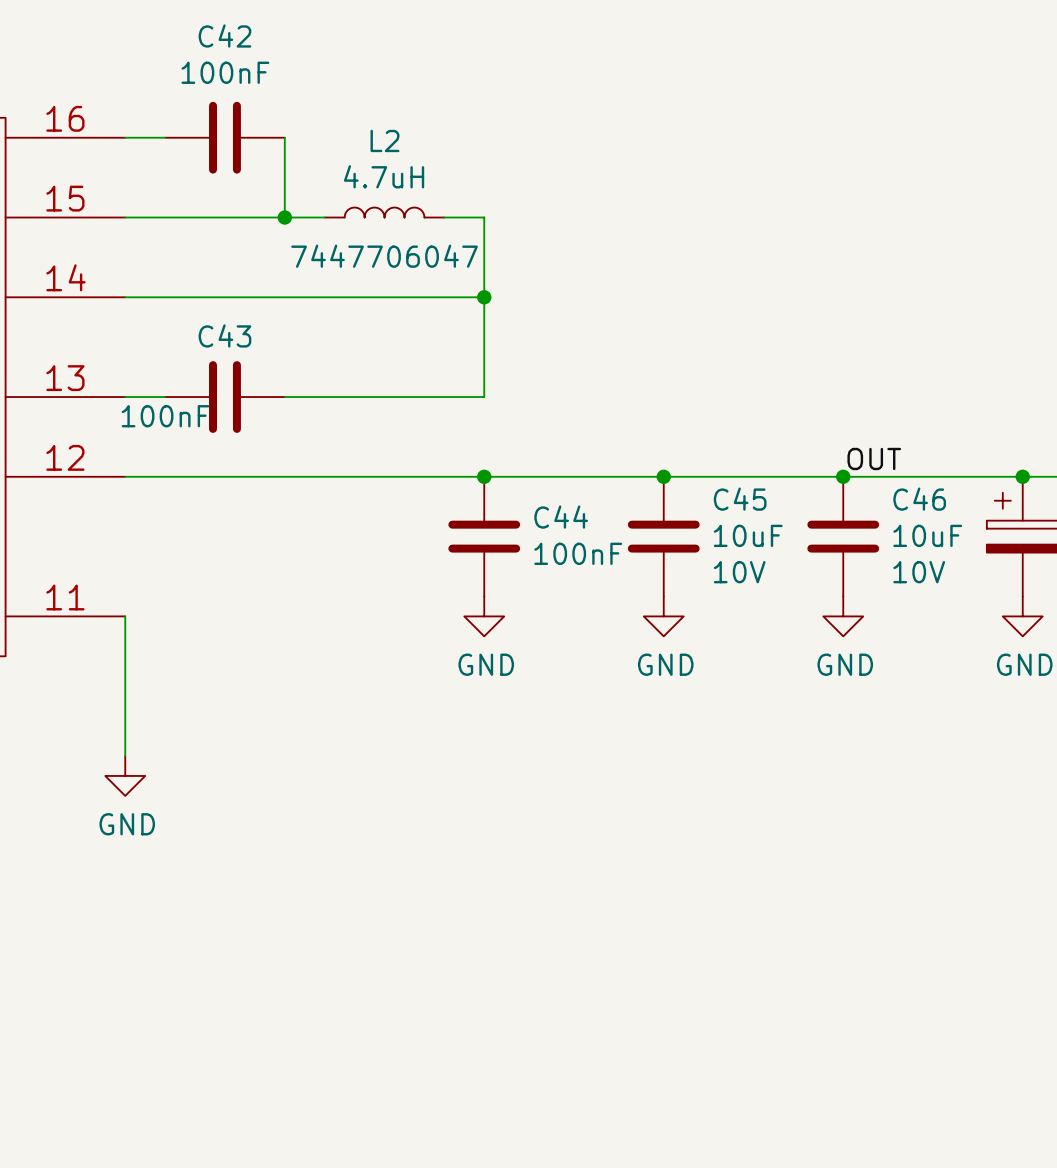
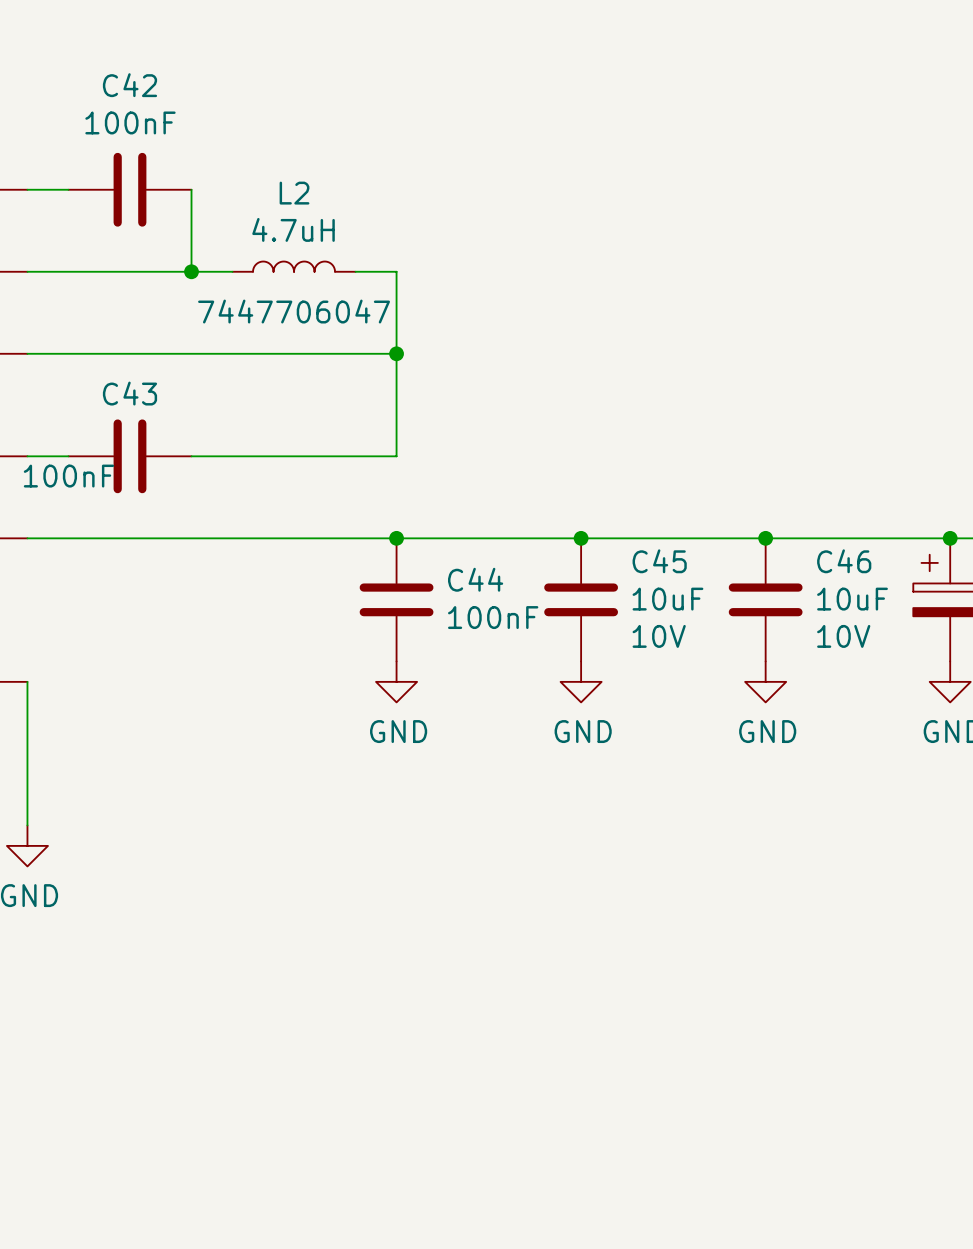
label: OUT (874, 458) -> none

